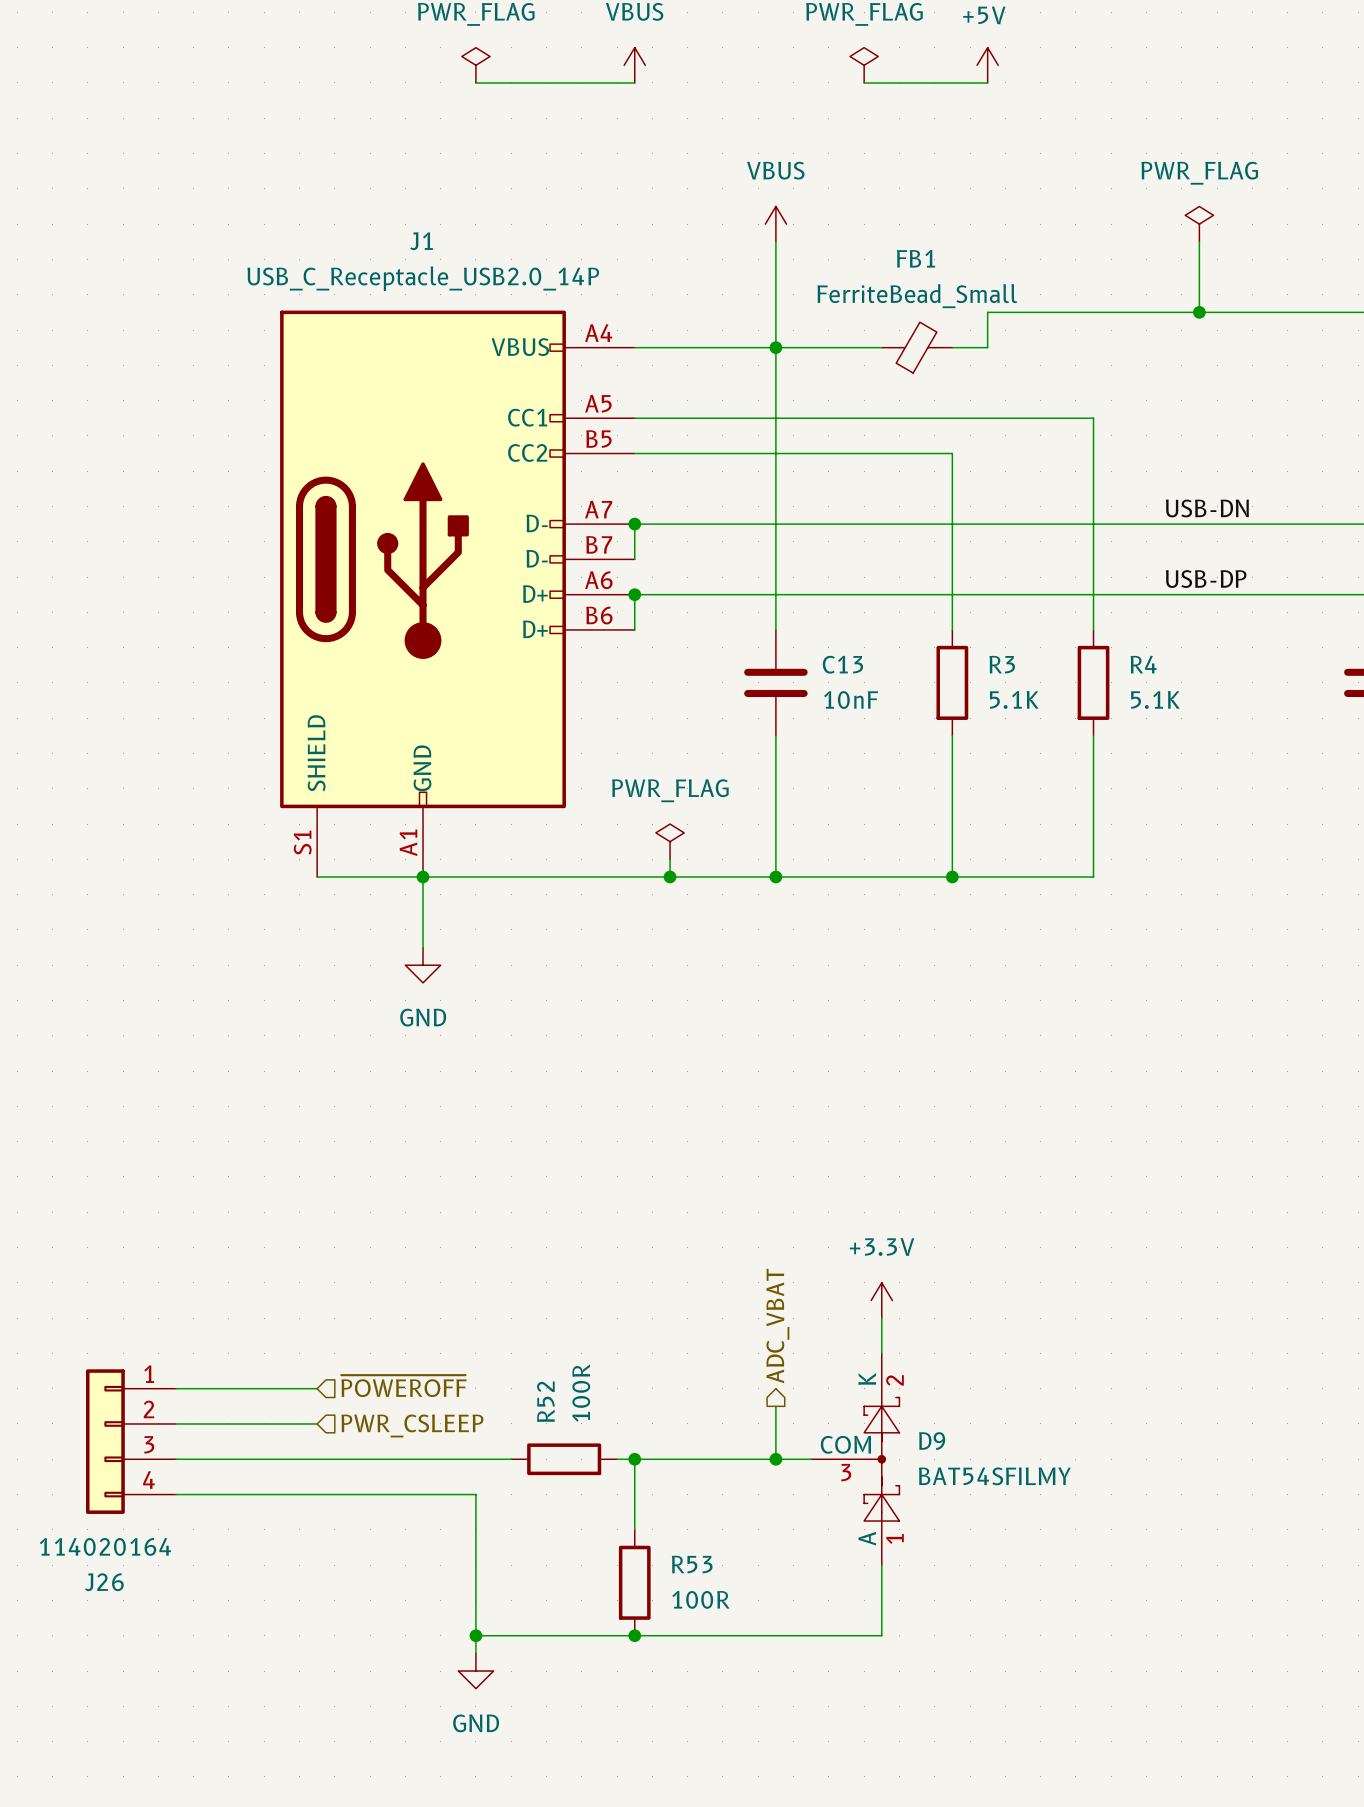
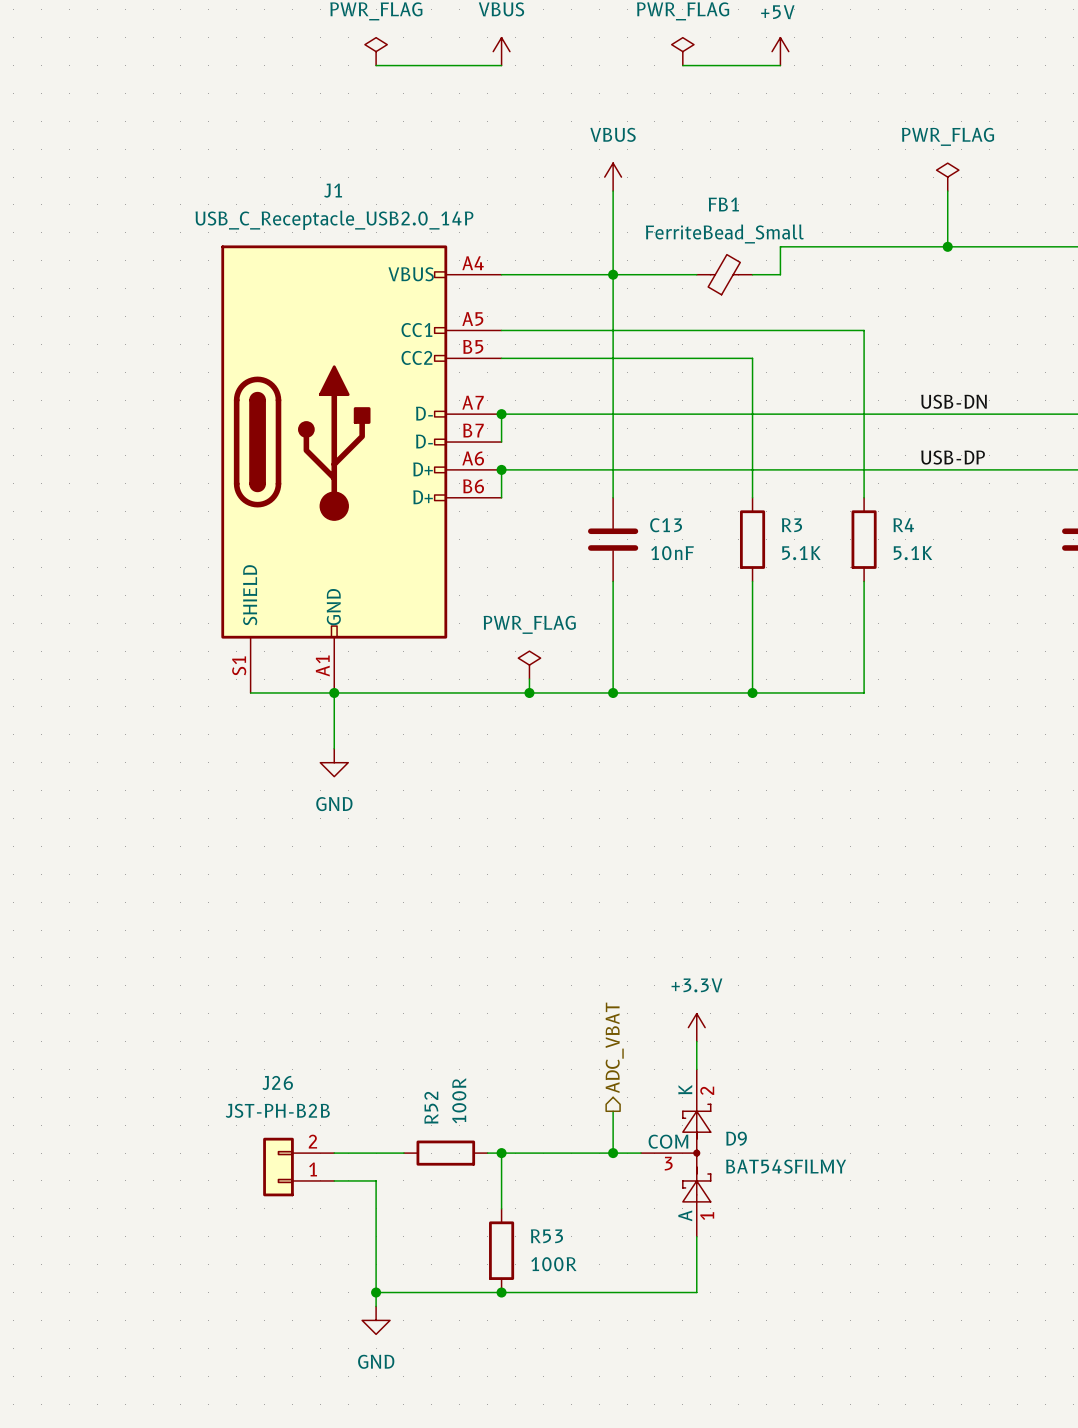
J26 symbol: [86, 1369, 176, 1514] -> [263, 1137, 335, 1197]
hierarchical label: ~{POWEROFF} (403, 1386) -> none
wire: (175, 1388) (317, 1388) -> none
wire: (175, 1423) (317, 1423) -> none
hierarchical label: PWR_CSLEEP (412, 1425) -> none
wire: (175, 1459) (423, 1459) -> none
wire: (175, 1494) (423, 1494) -> none
J26 value: 114020164 (105, 1546) -> JST-PH-B2B (277, 1110)
J26 name position: J26 (104, 1582) -> J26 (277, 1082)

